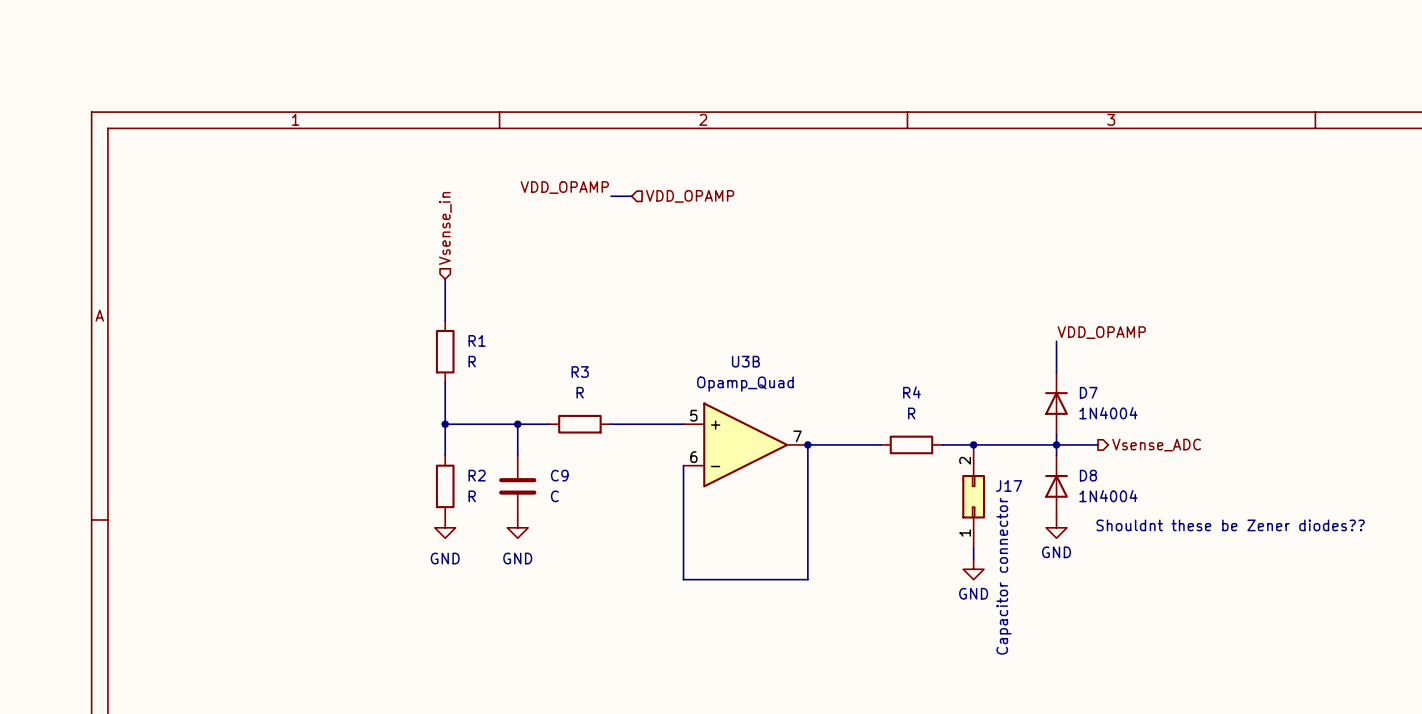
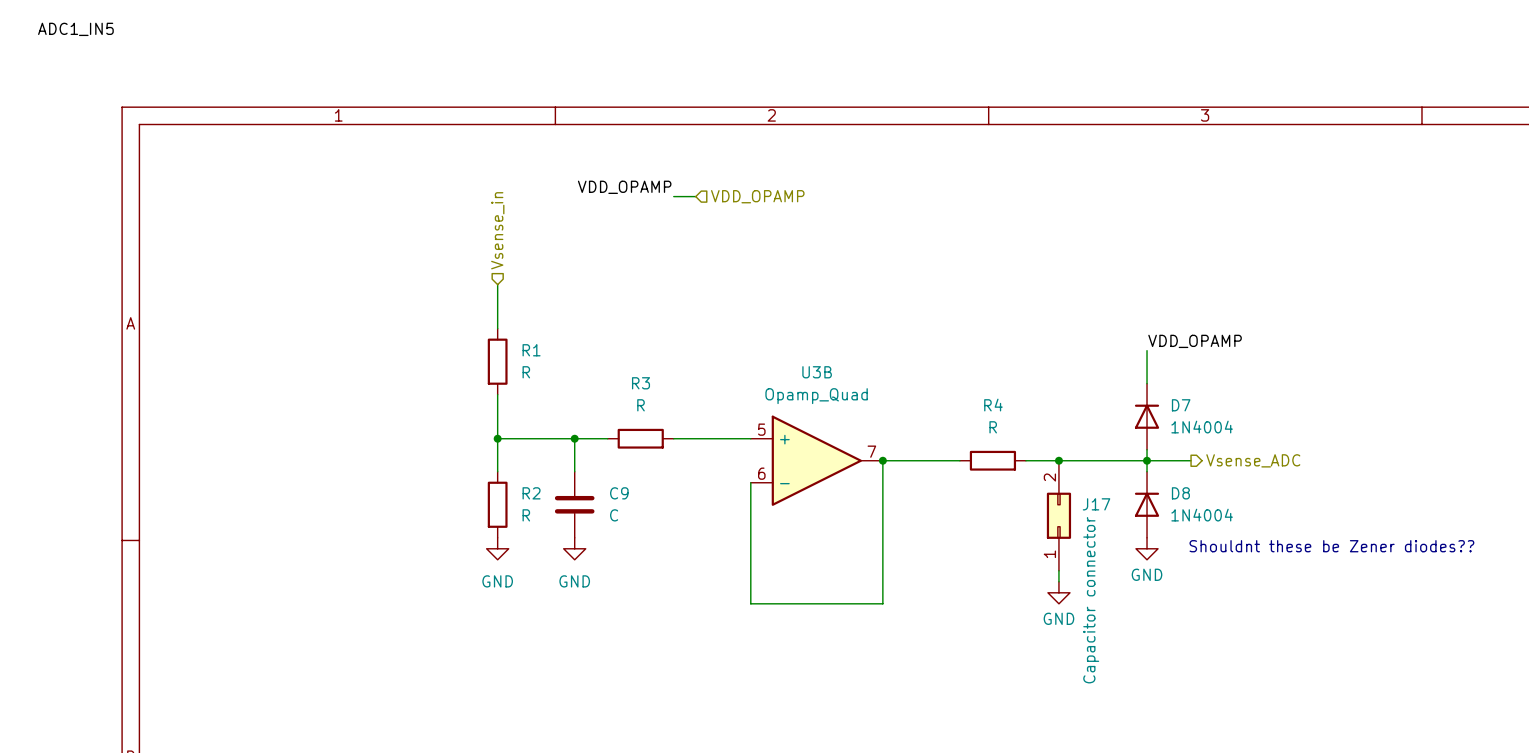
label: none -> ADC1_IN5 (75, 29)

